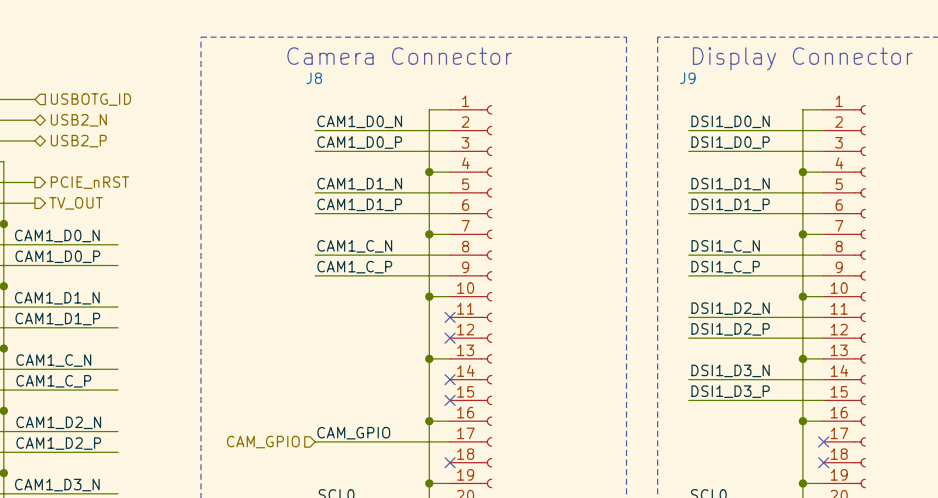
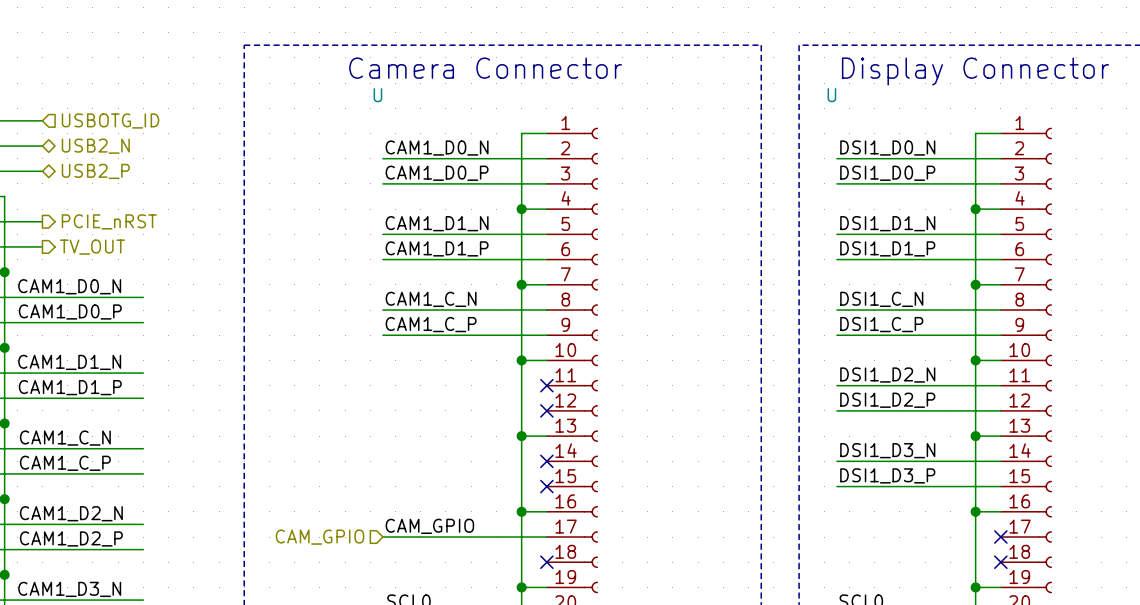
J8 name: J8 (314, 78) -> U (377, 95)
J9 name: J9 (687, 78) -> U (831, 95)

